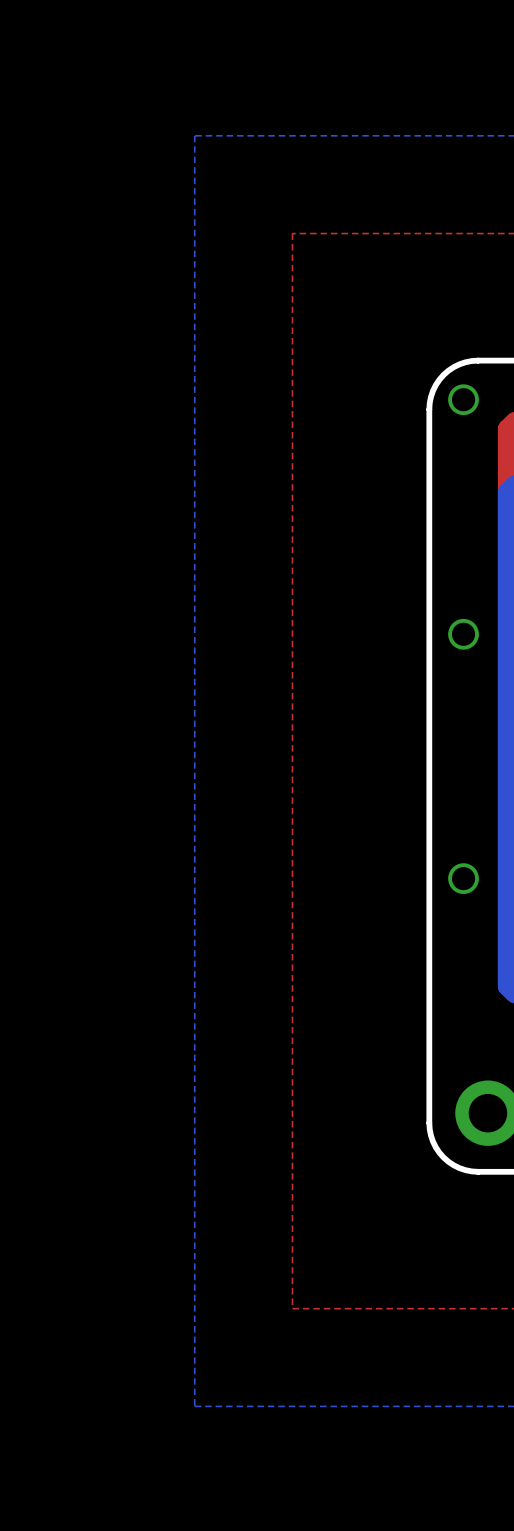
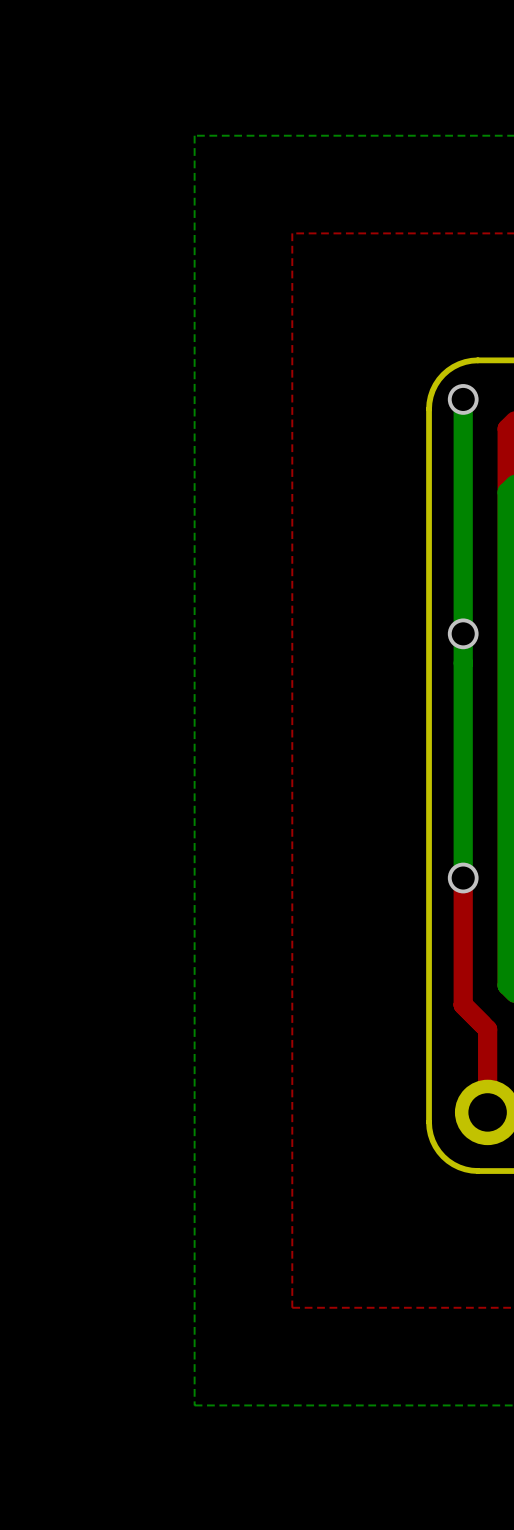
bottom track: none -> (463, 399) (463, 878)
top track: none -> (463, 878) (463, 1004) (487, 1029) (487, 1112)

